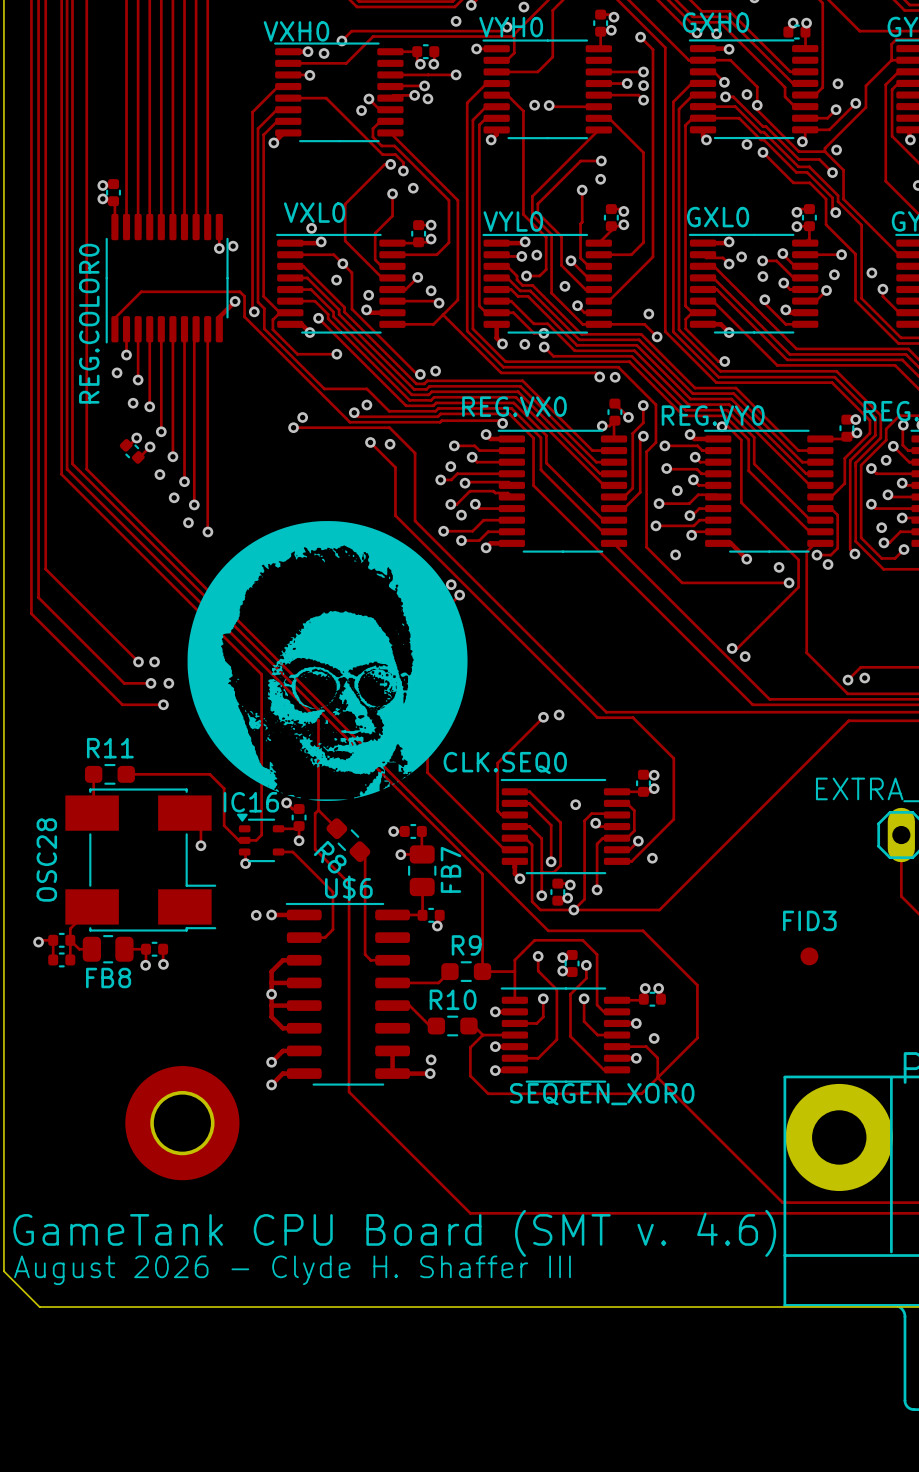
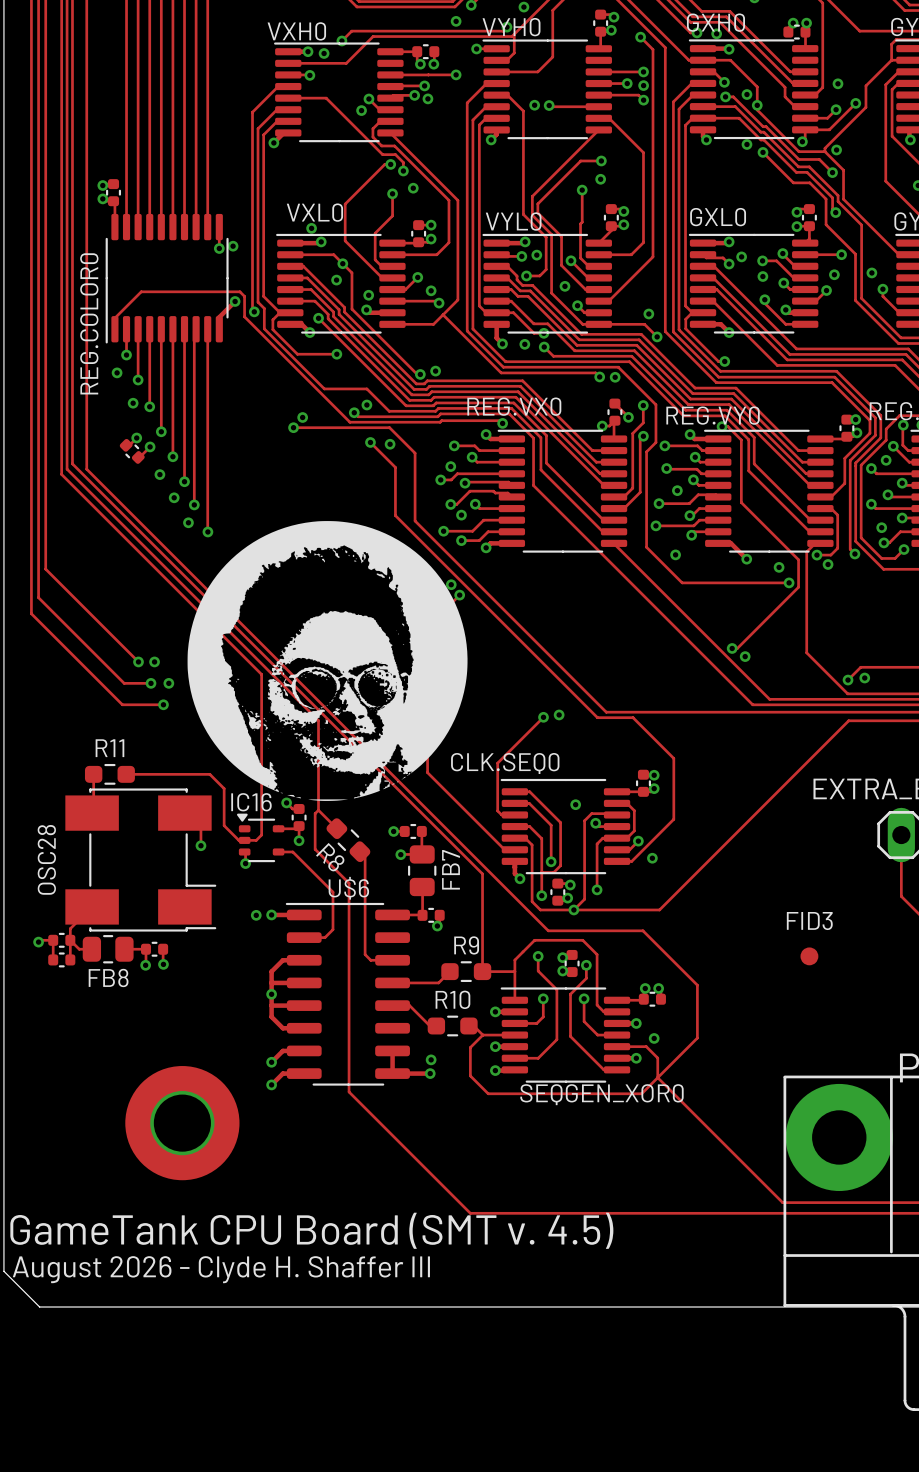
text: GameTank CPU Board (SMT v. 4.6) (394, 1233) -> GameTank CPU Board (SMT v. 4.5) (311, 1230)

